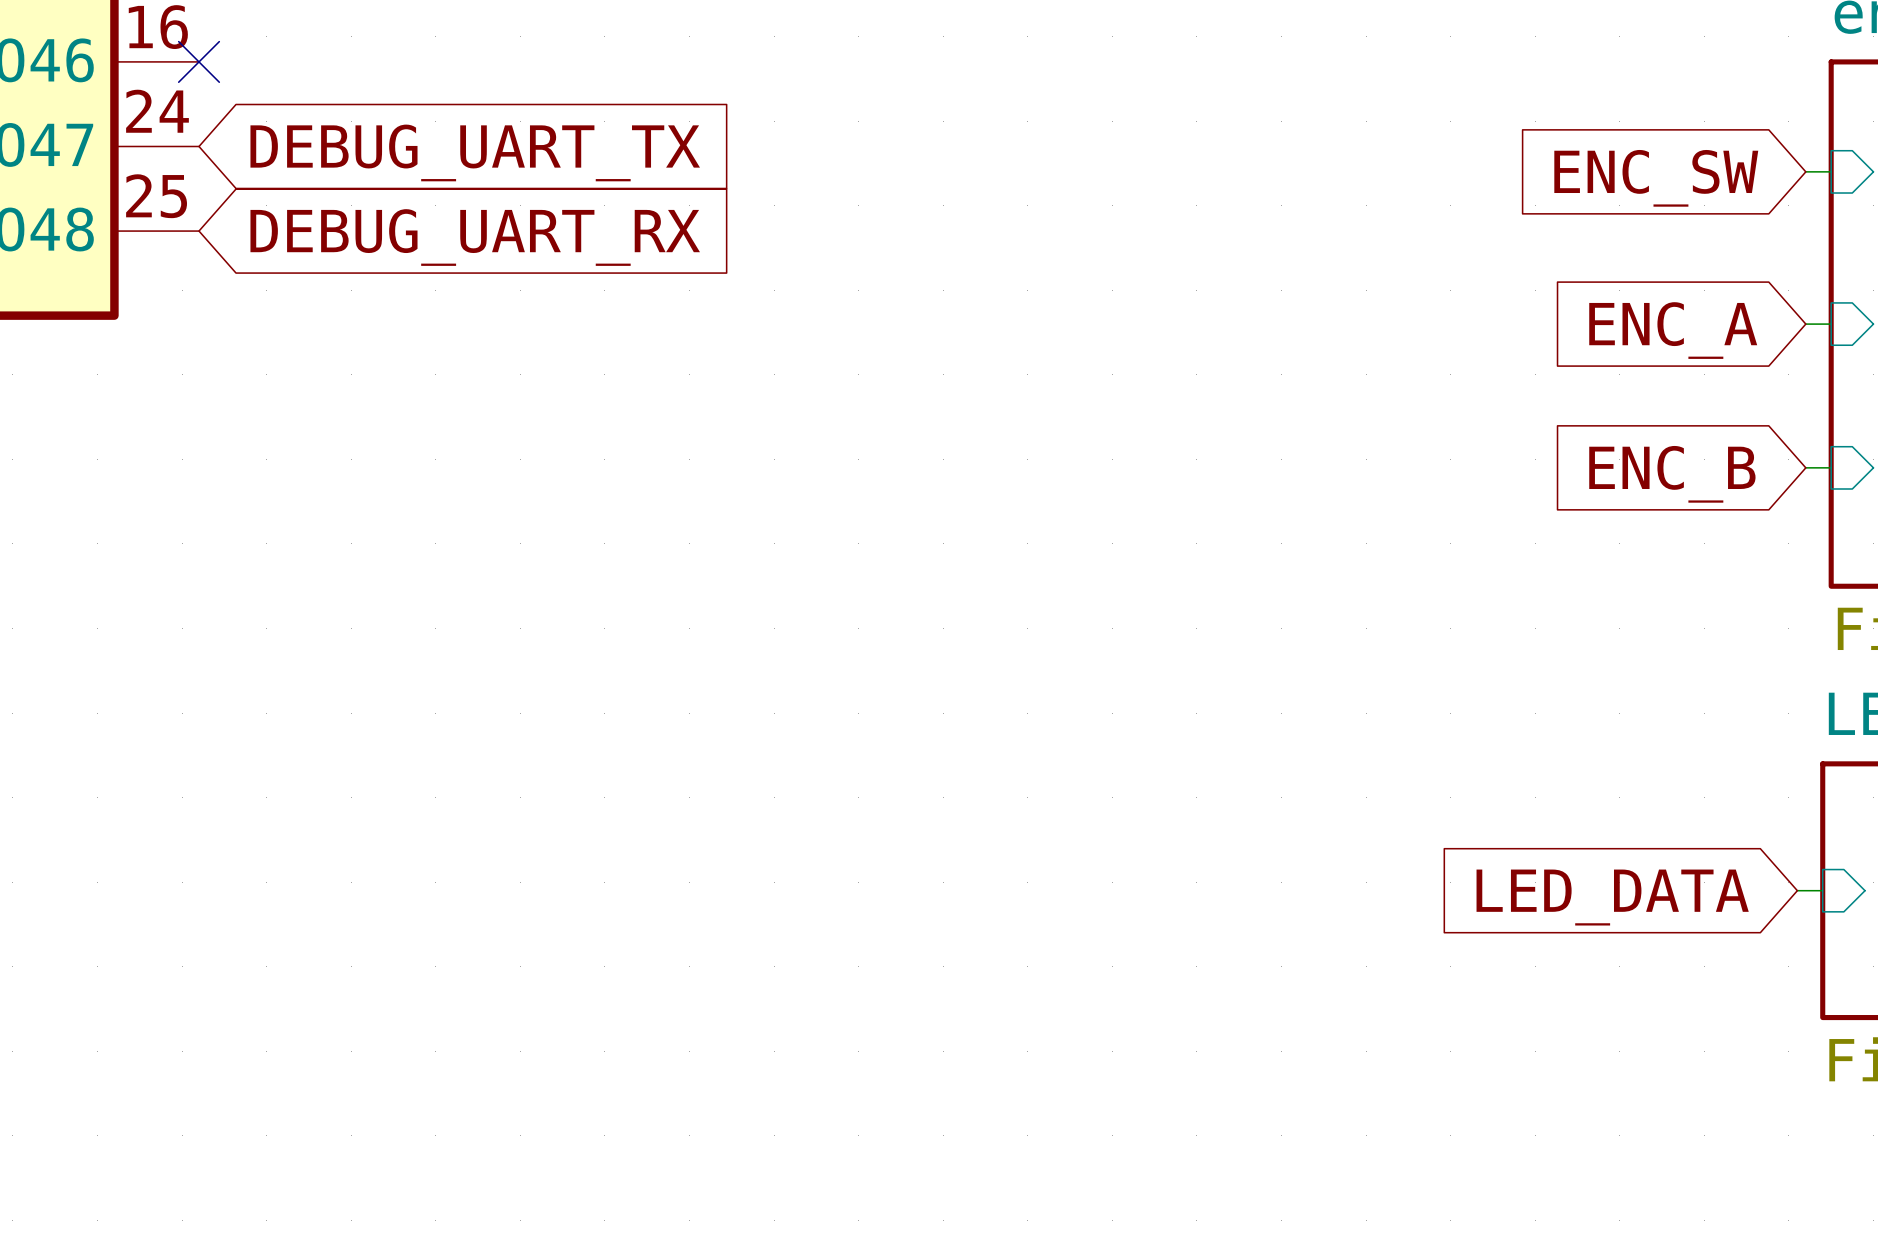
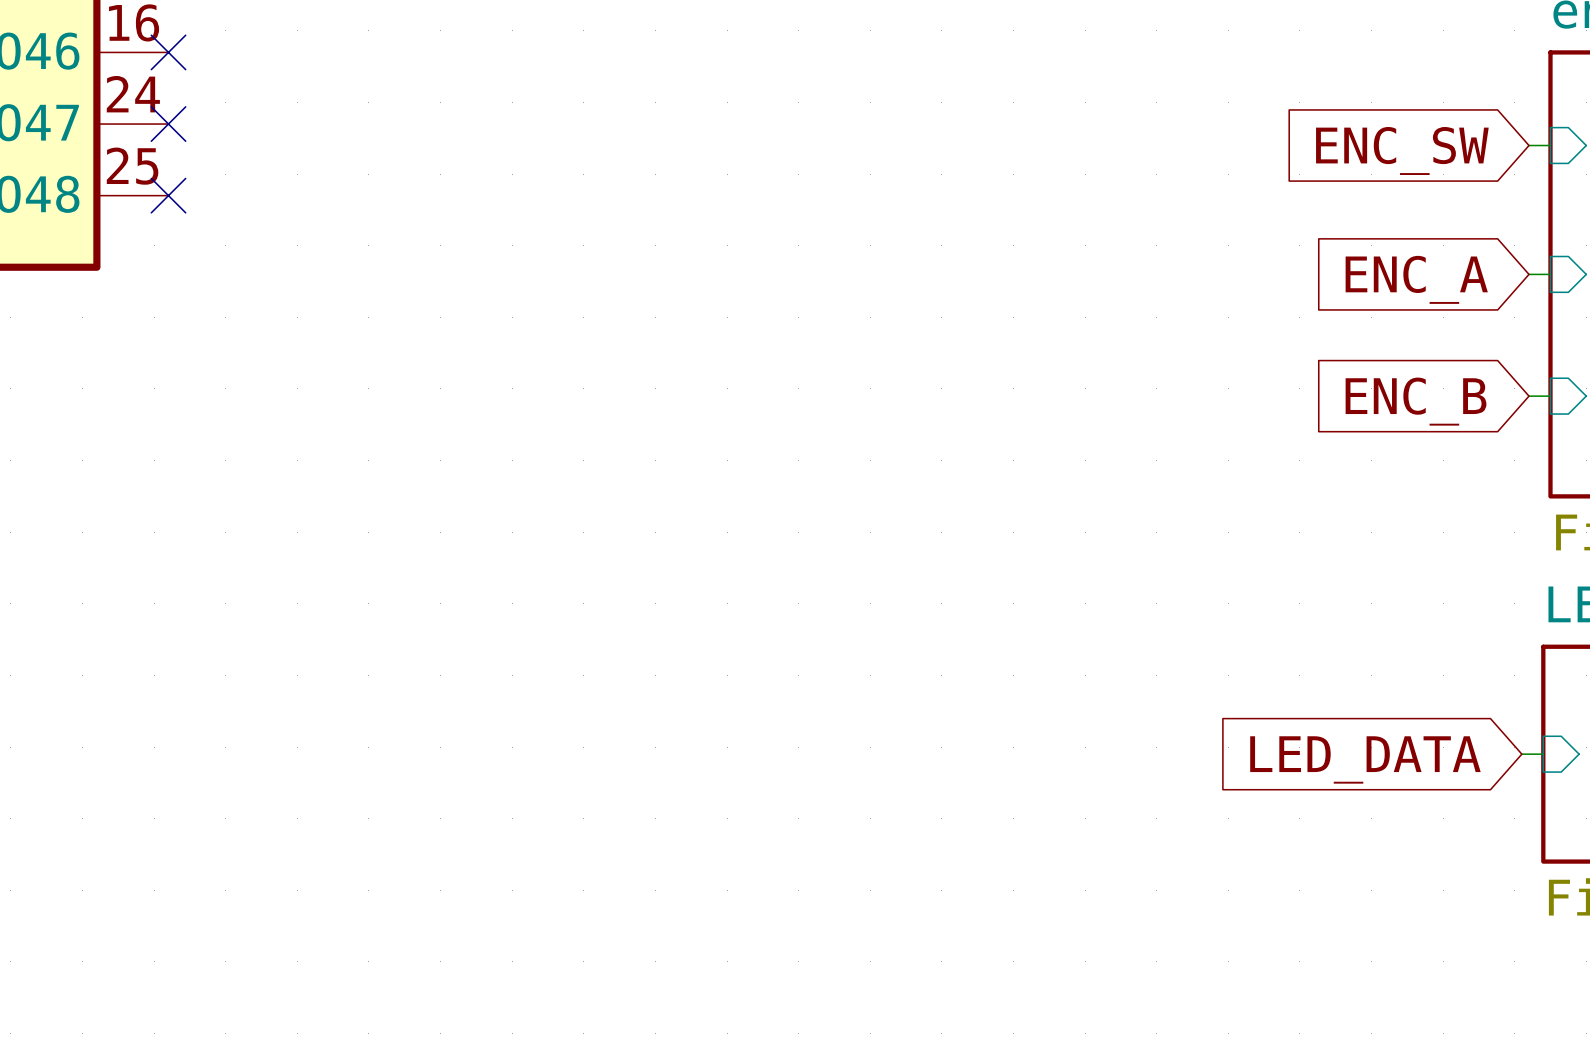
no-connect mark: none -> (168, 124)
global label: DEBUG_UART_TX (475, 152) -> none
no-connect mark: none -> (168, 195)
global label: DEBUG_UART_RX (475, 237) -> none

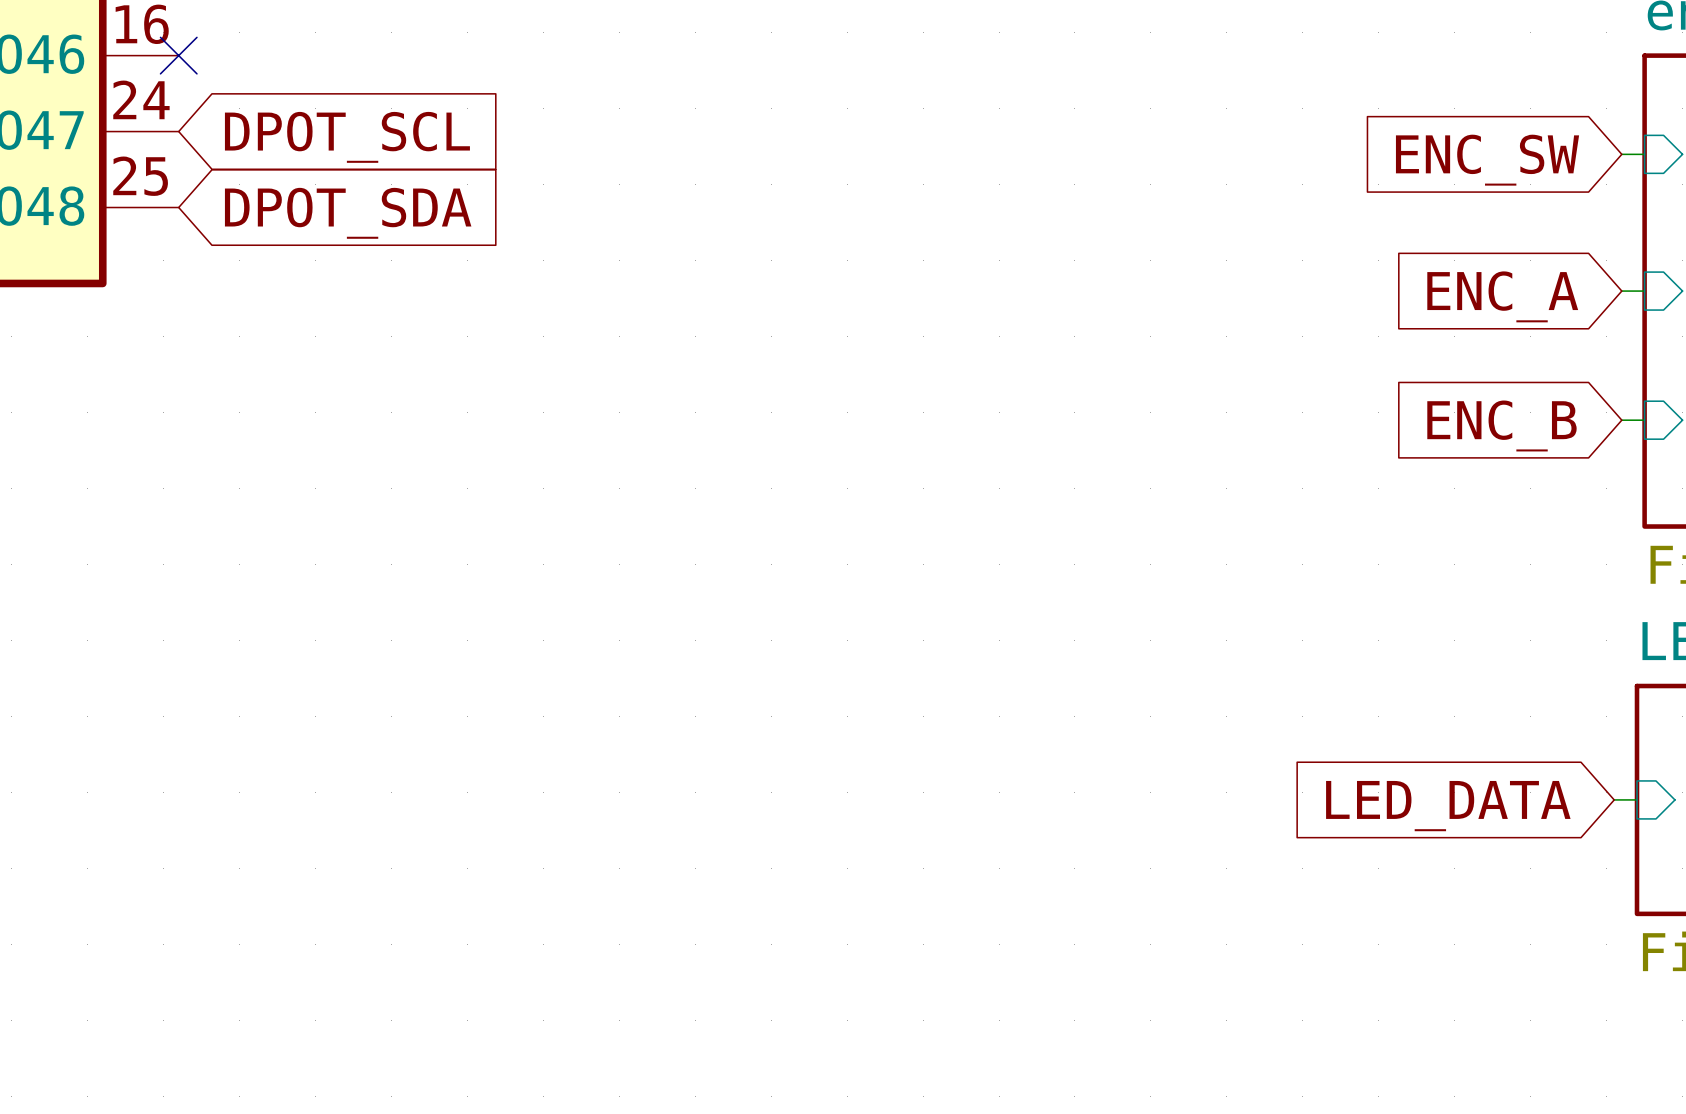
no-connect mark: (168, 124) -> none
global label: none -> DPOT_SCL (347, 137)
no-connect mark: (168, 195) -> none
global label: none -> DPOT_SDA (348, 213)

